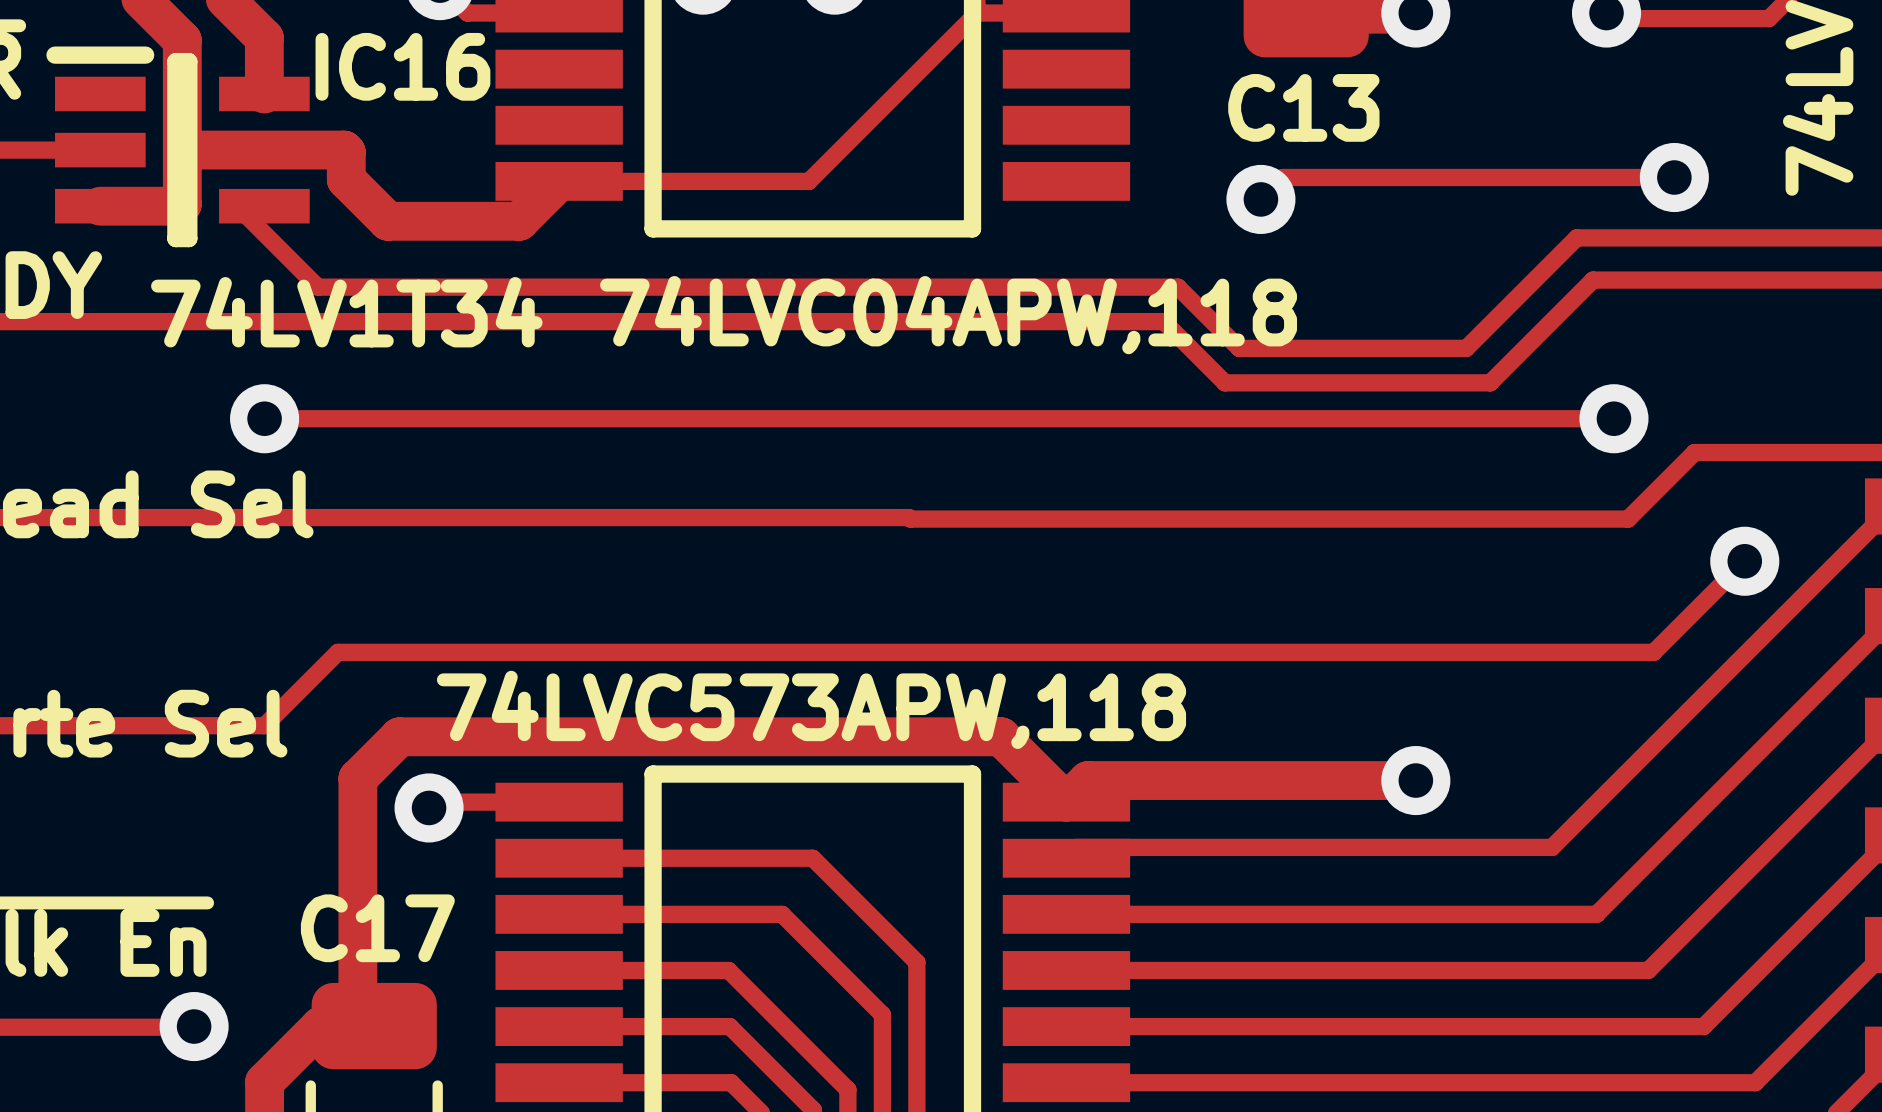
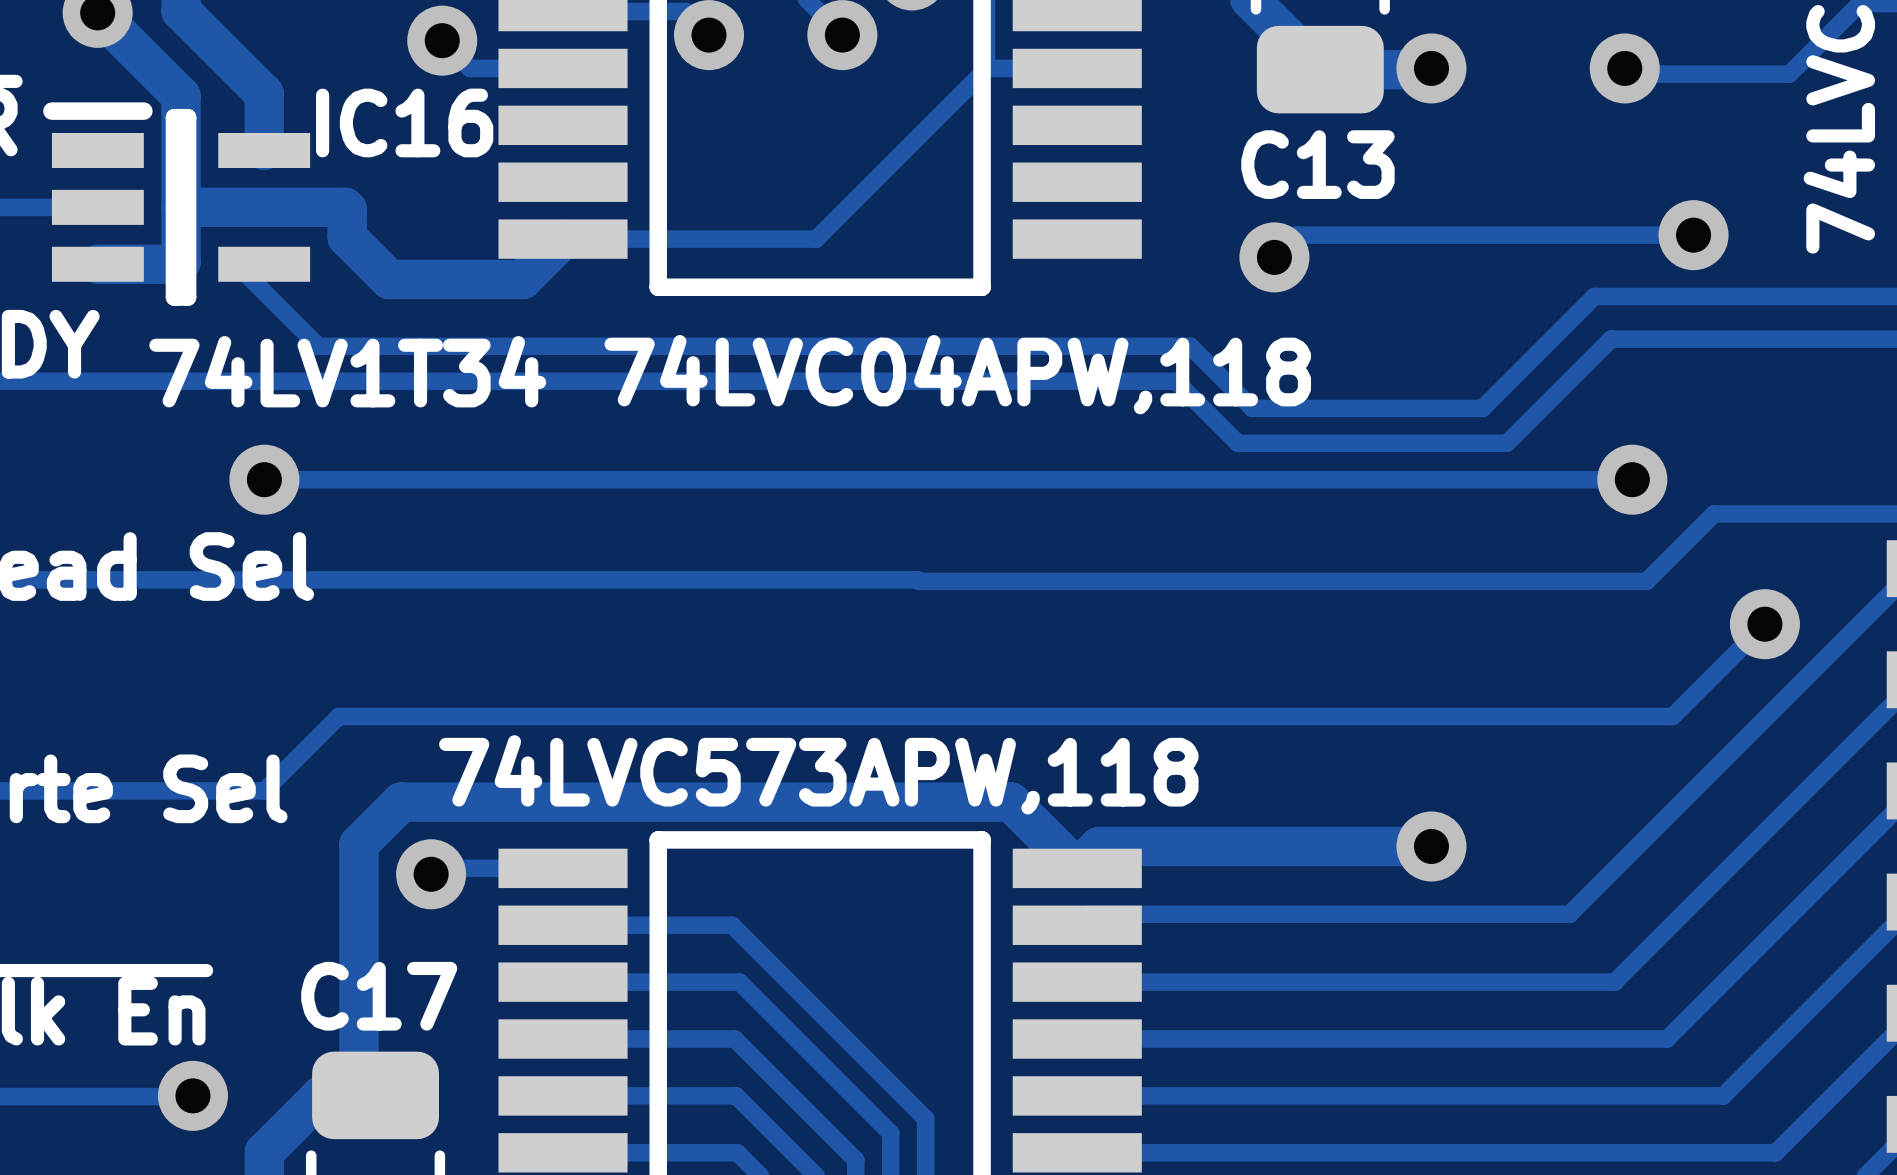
track: (726, 858) (812, 858) (916, 962) (916, 1049) -> none
track: (733, 914) (782, 914) -> (732, 925) (789, 982)
track: none -> (739, 982) (890, 1133)
track: (882, 1014) (882, 1063) -> (890, 1083) (925, 1118)

